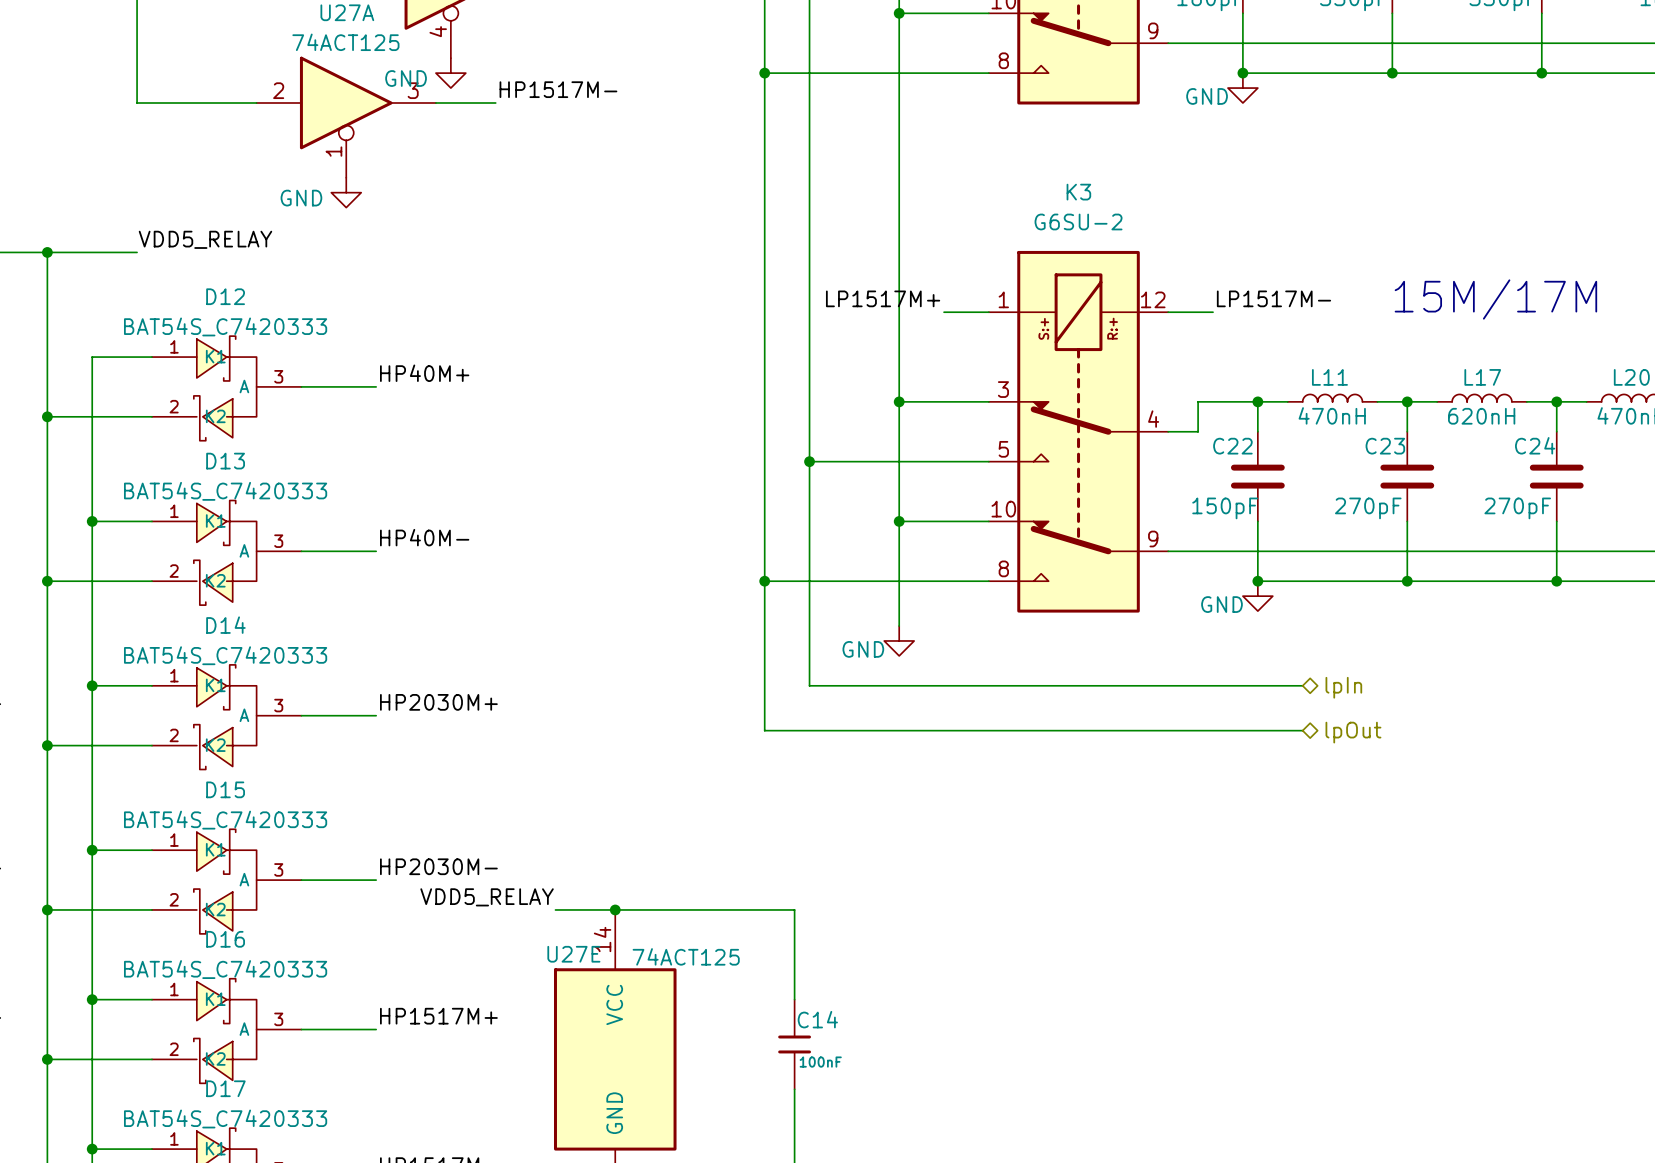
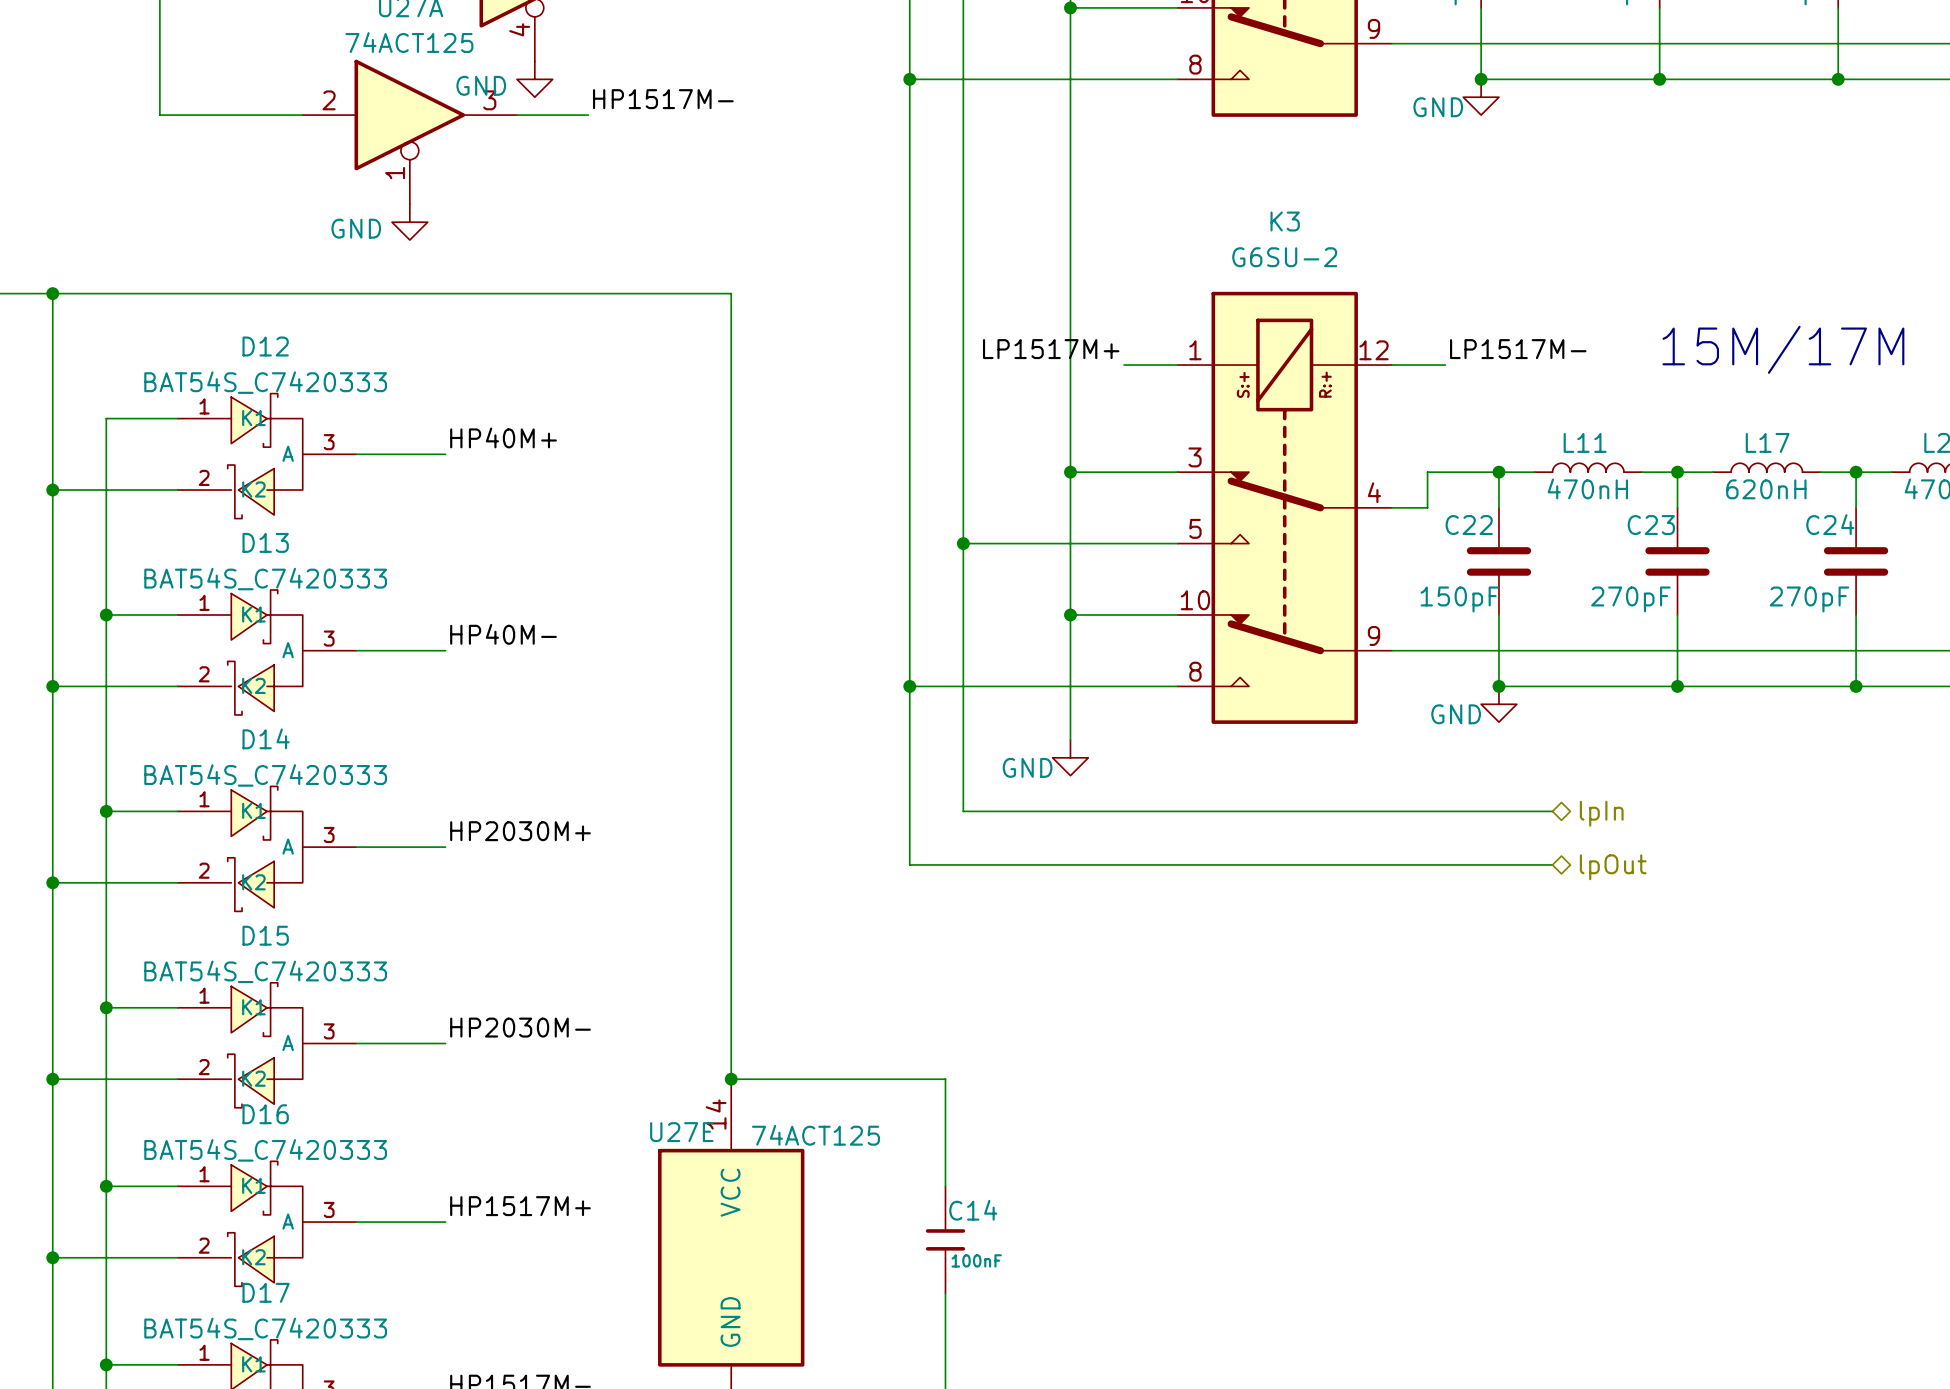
label: VDD5_RELAY (205, 239) -> none
label: VDD5_RELAY (487, 897) -> none
wire: (555, 909) (615, 909) -> (159, 293) (731, 293) (731, 1079)

